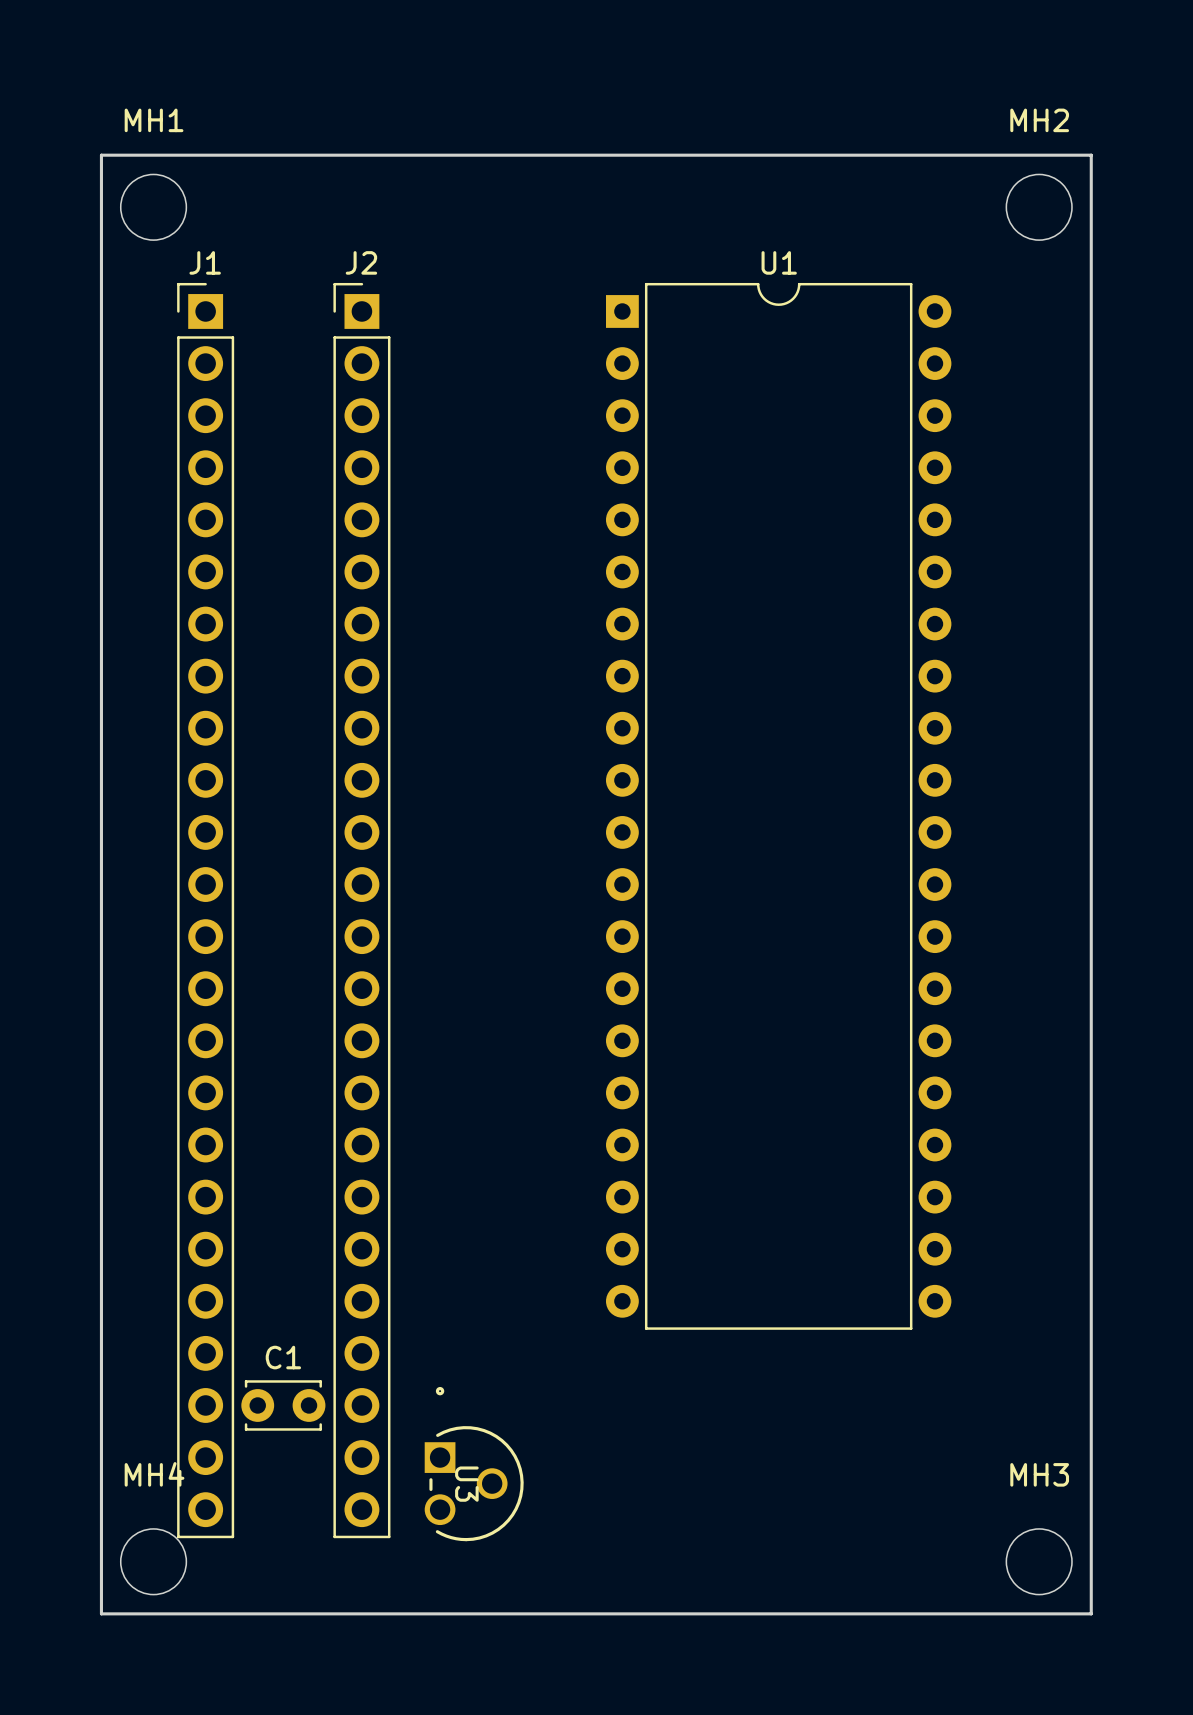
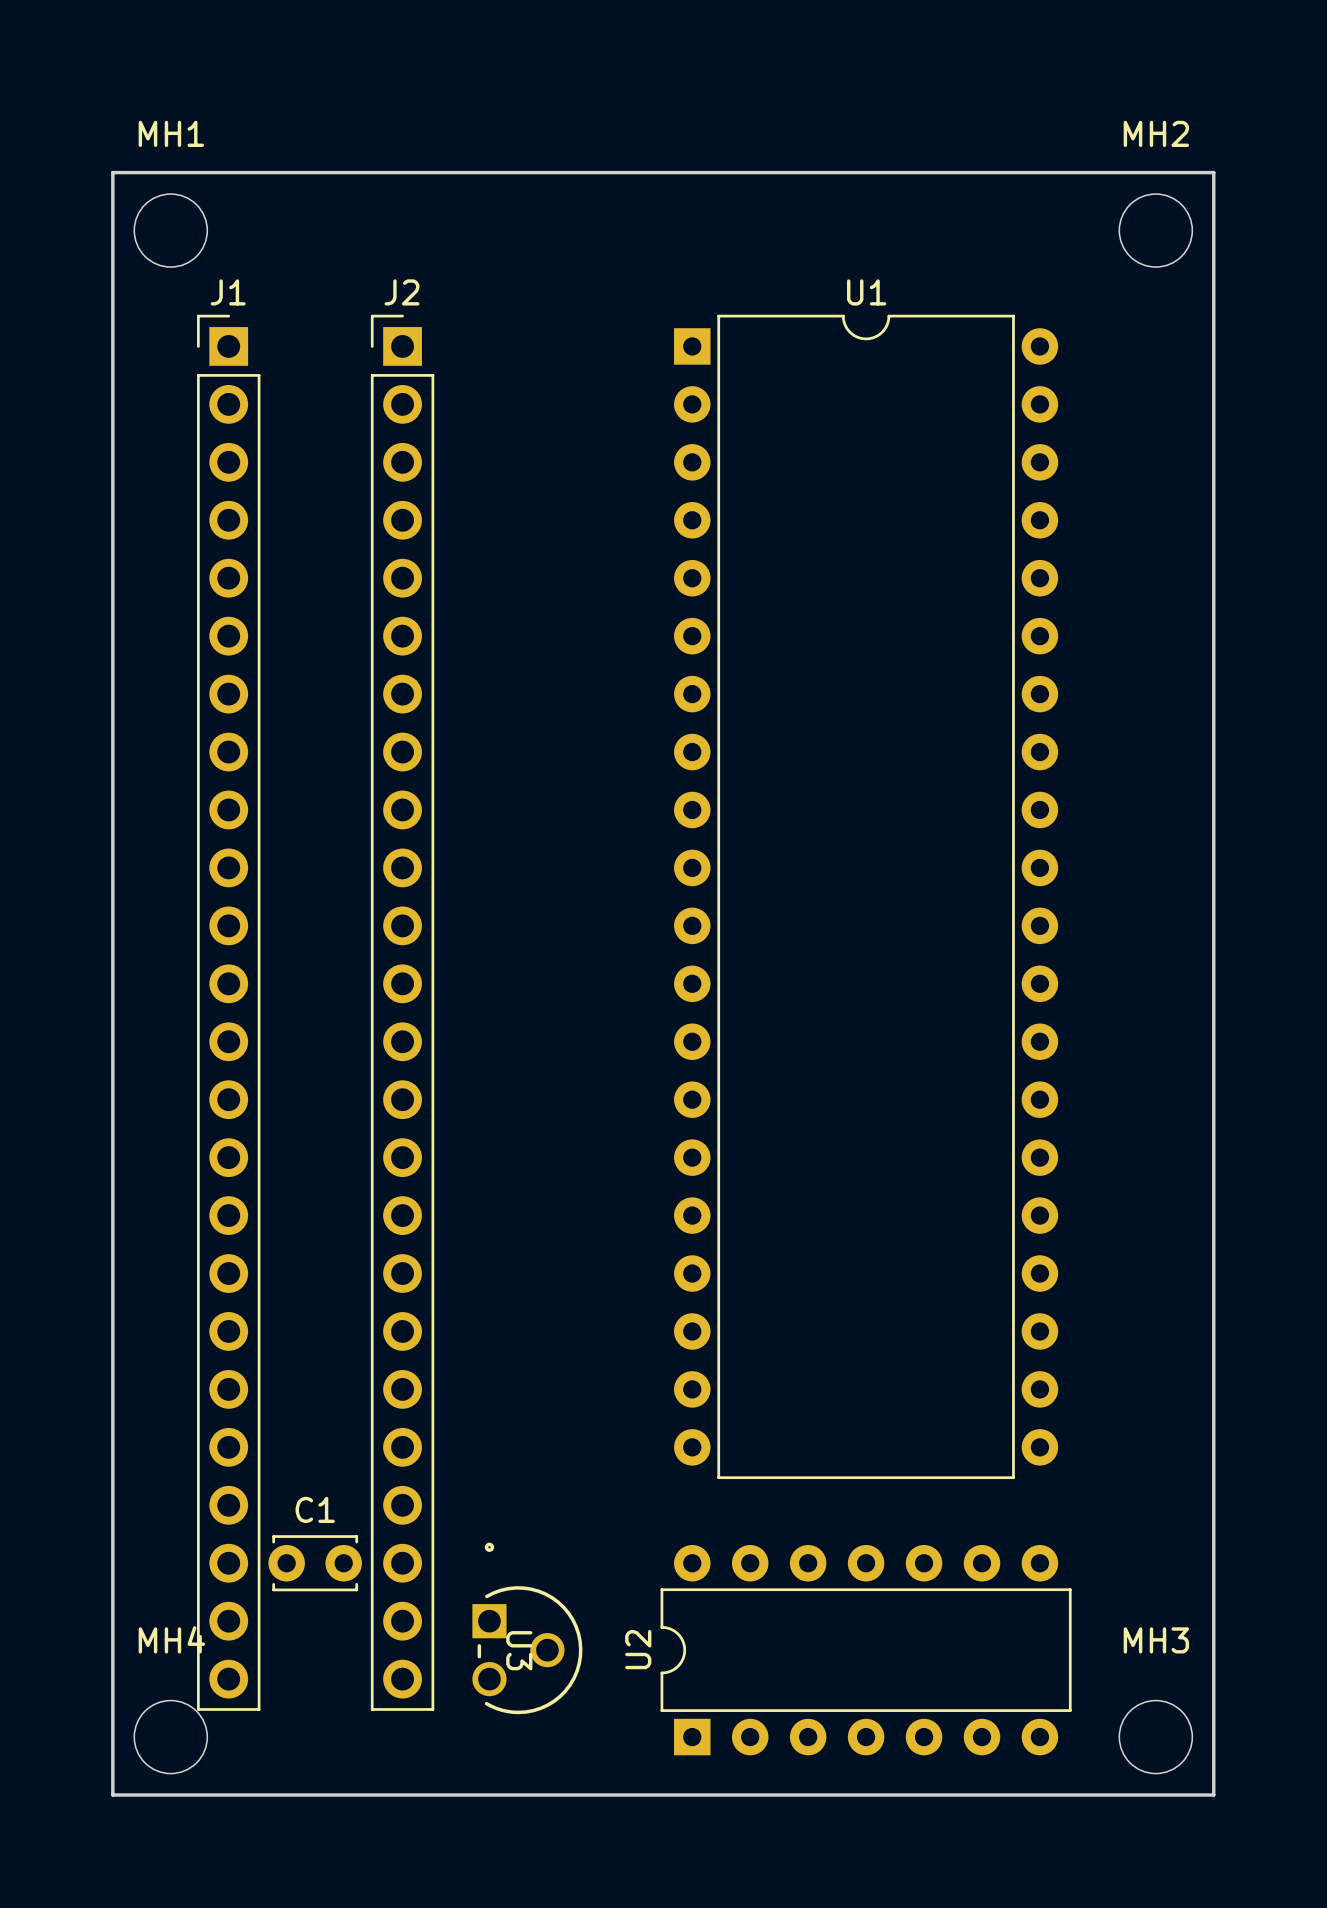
U2: none -> (866, 1650)

